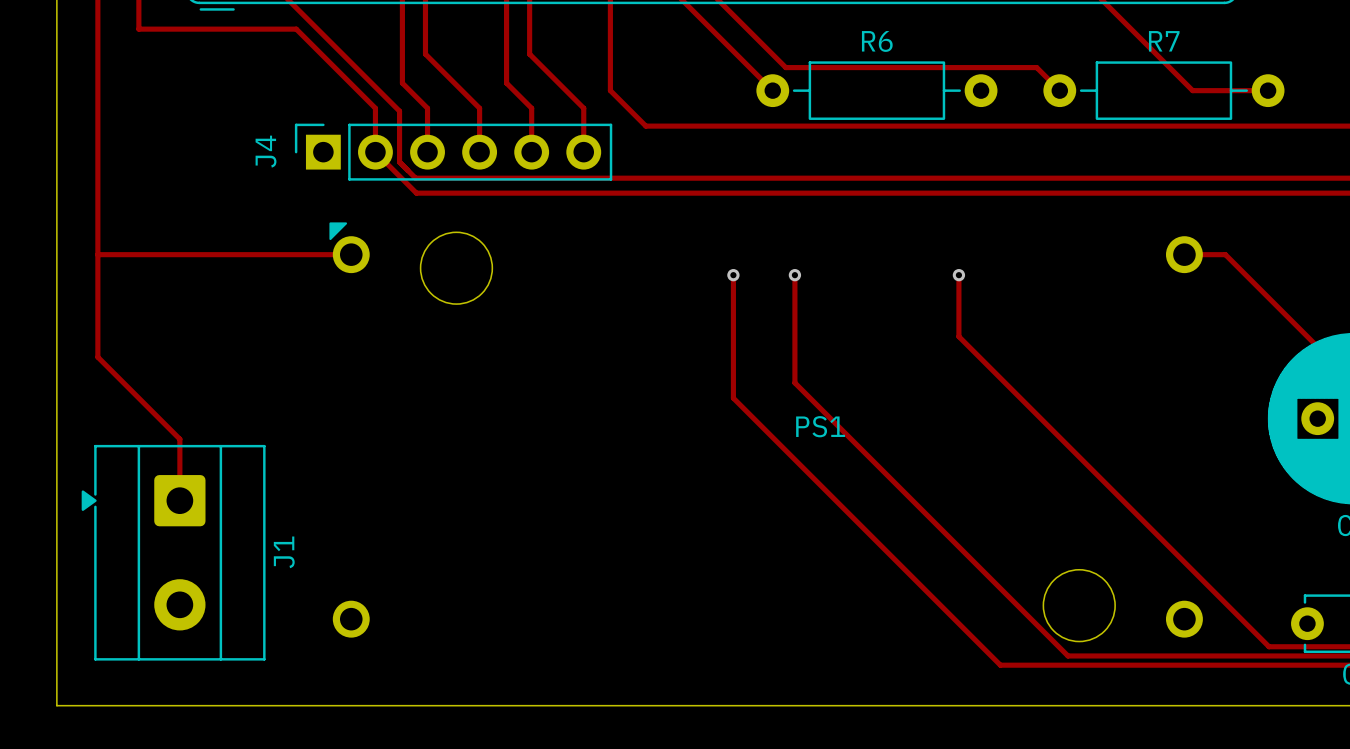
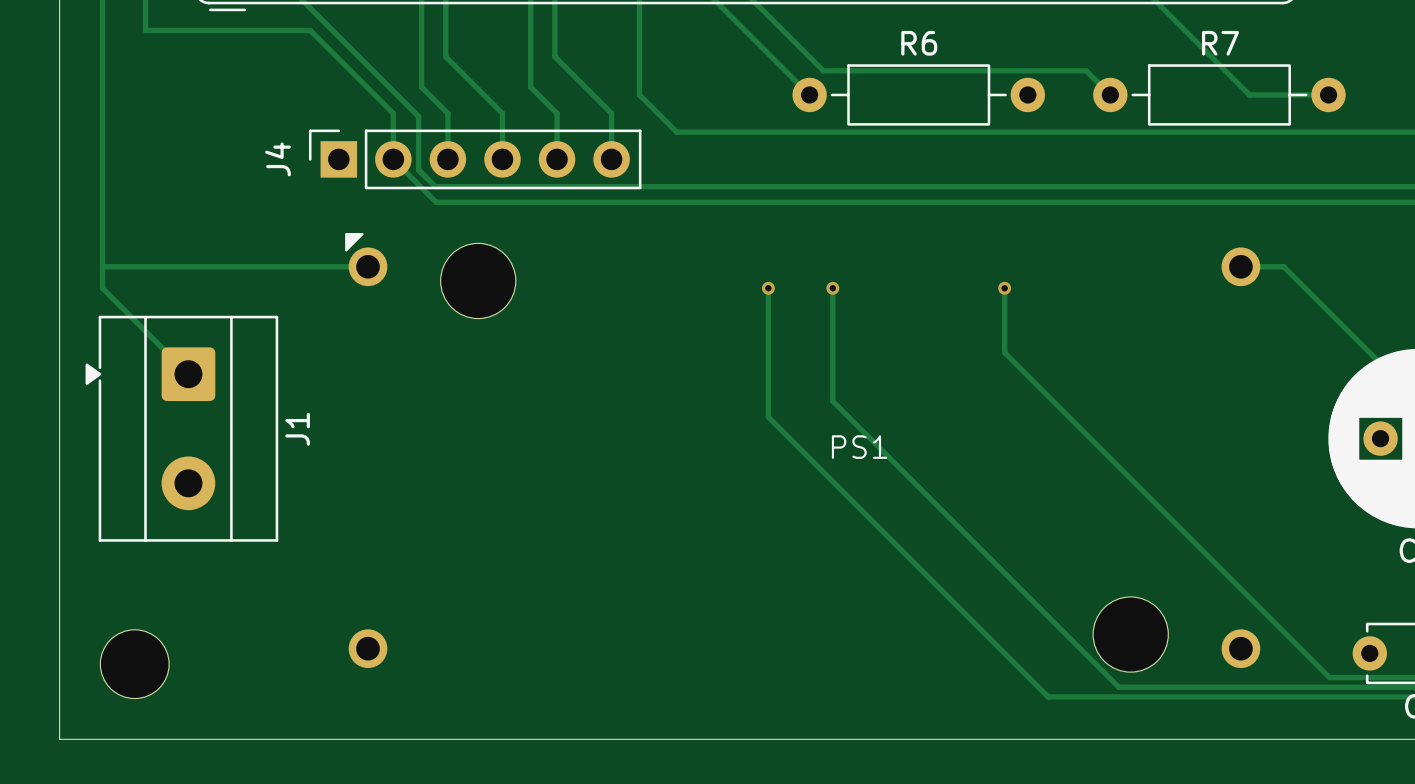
track: (97, 275) (97, 357) (179, 439) (179, 500) -> (102, 288) (188, 374)
J1 position: (173, 552) -> (181, 428)
part: none -> (134, 664)

